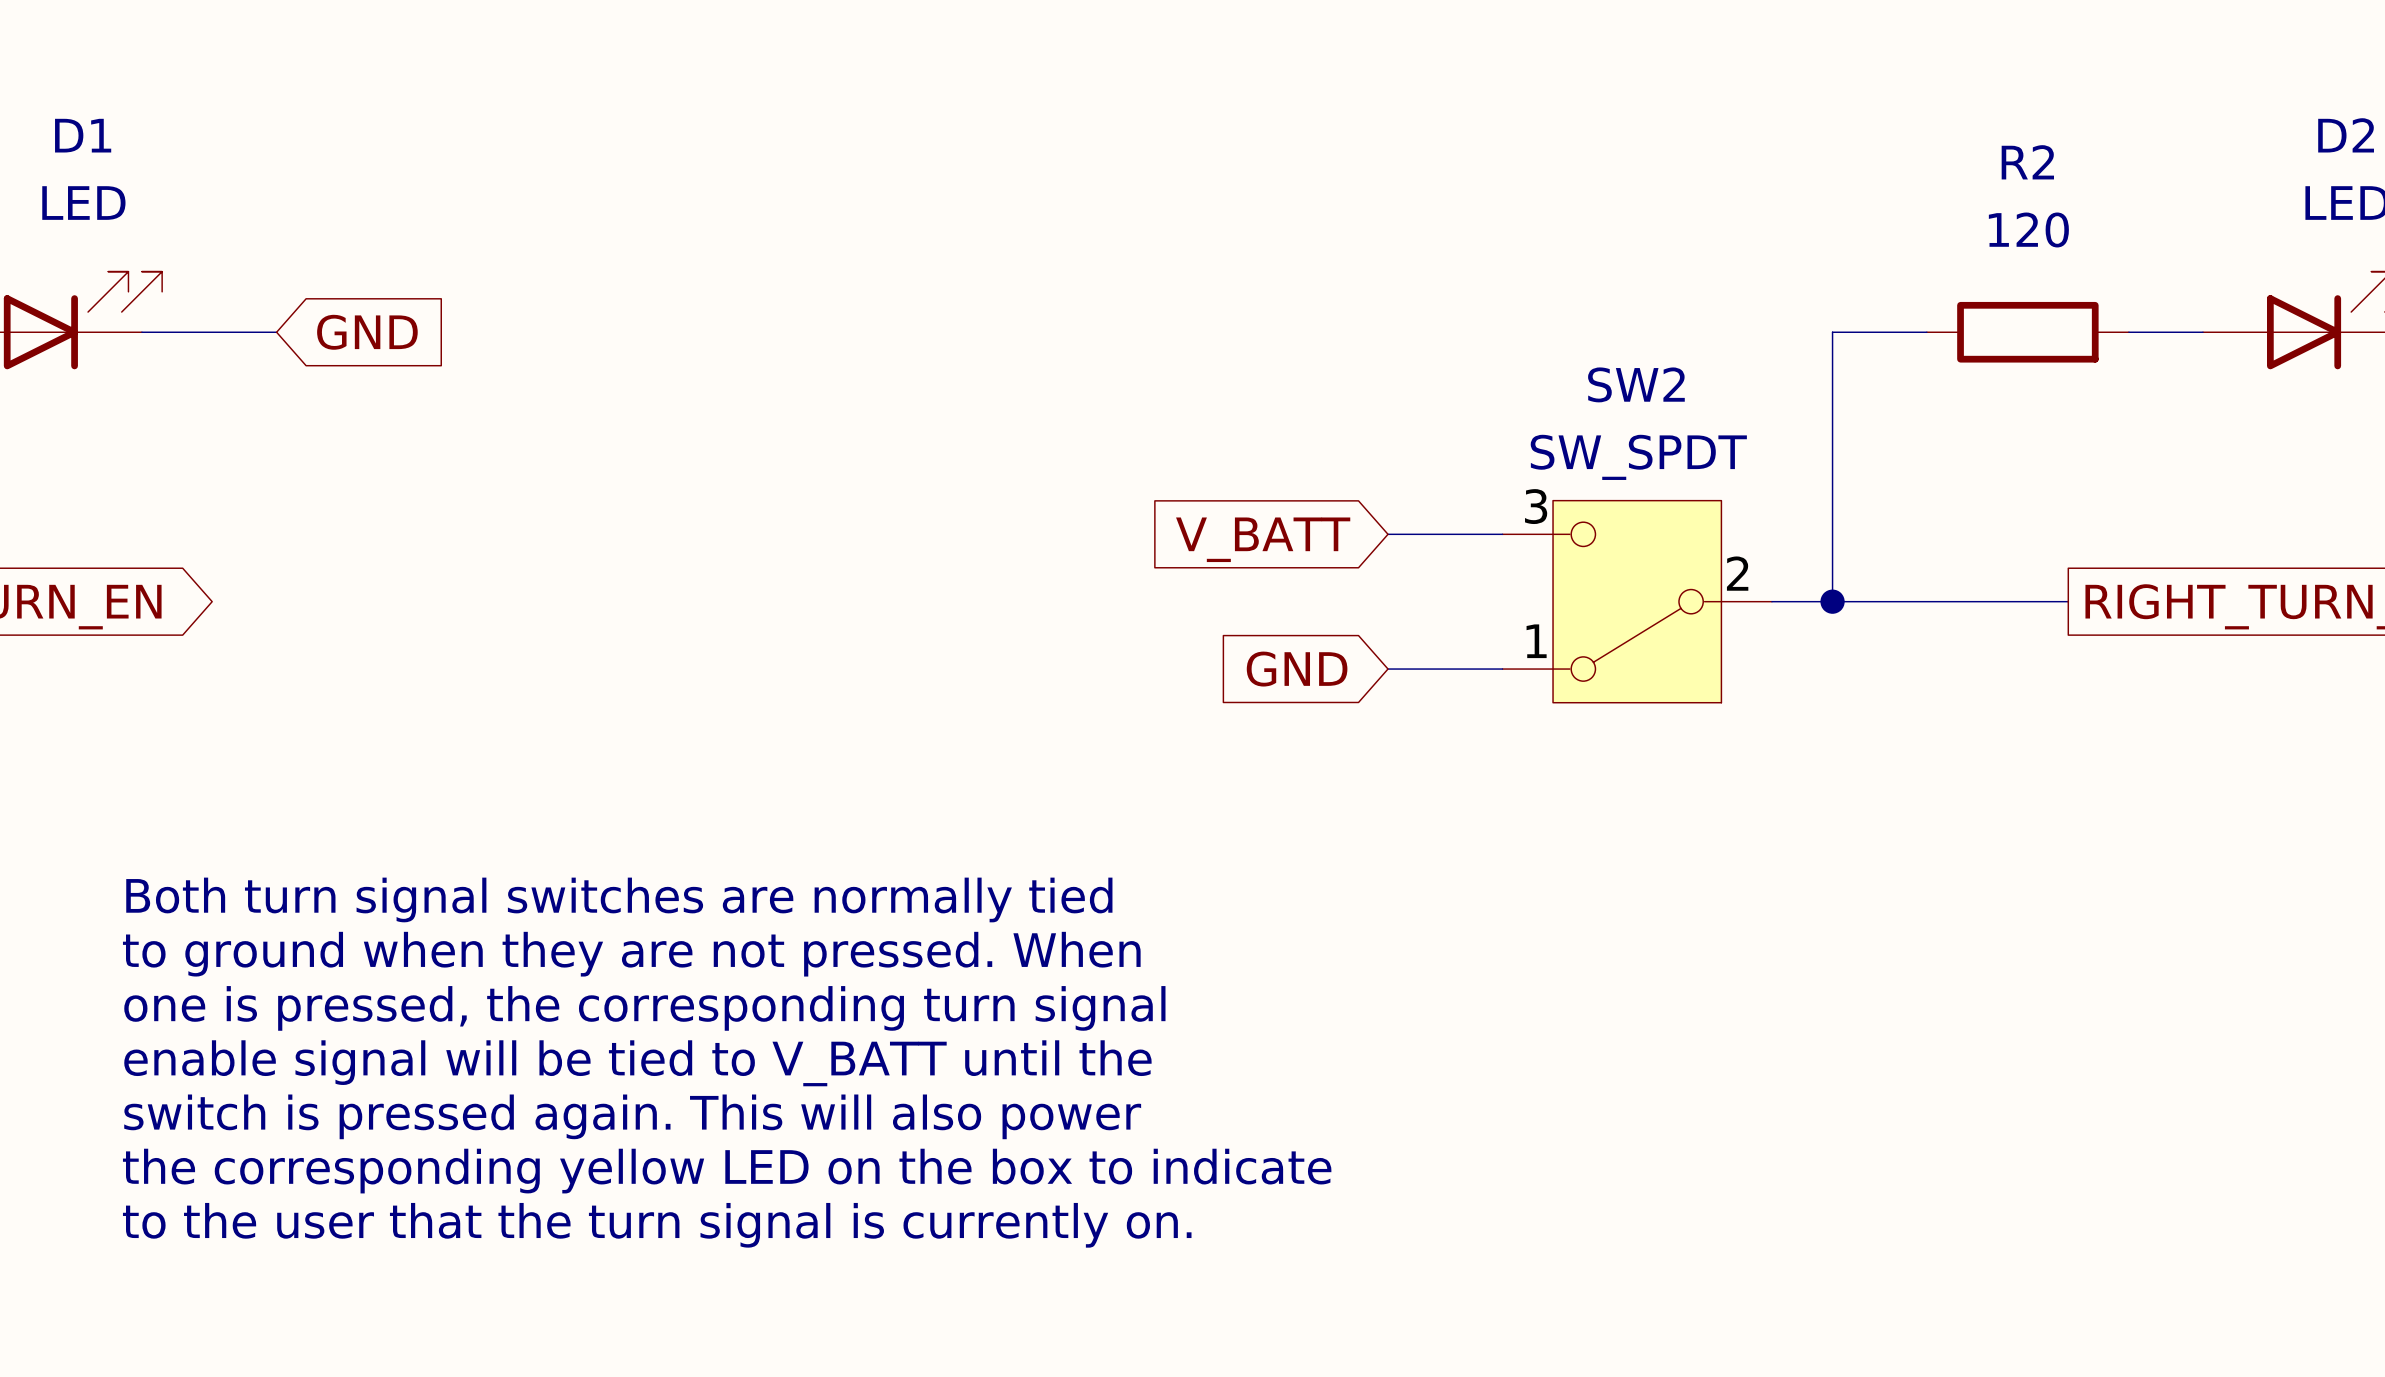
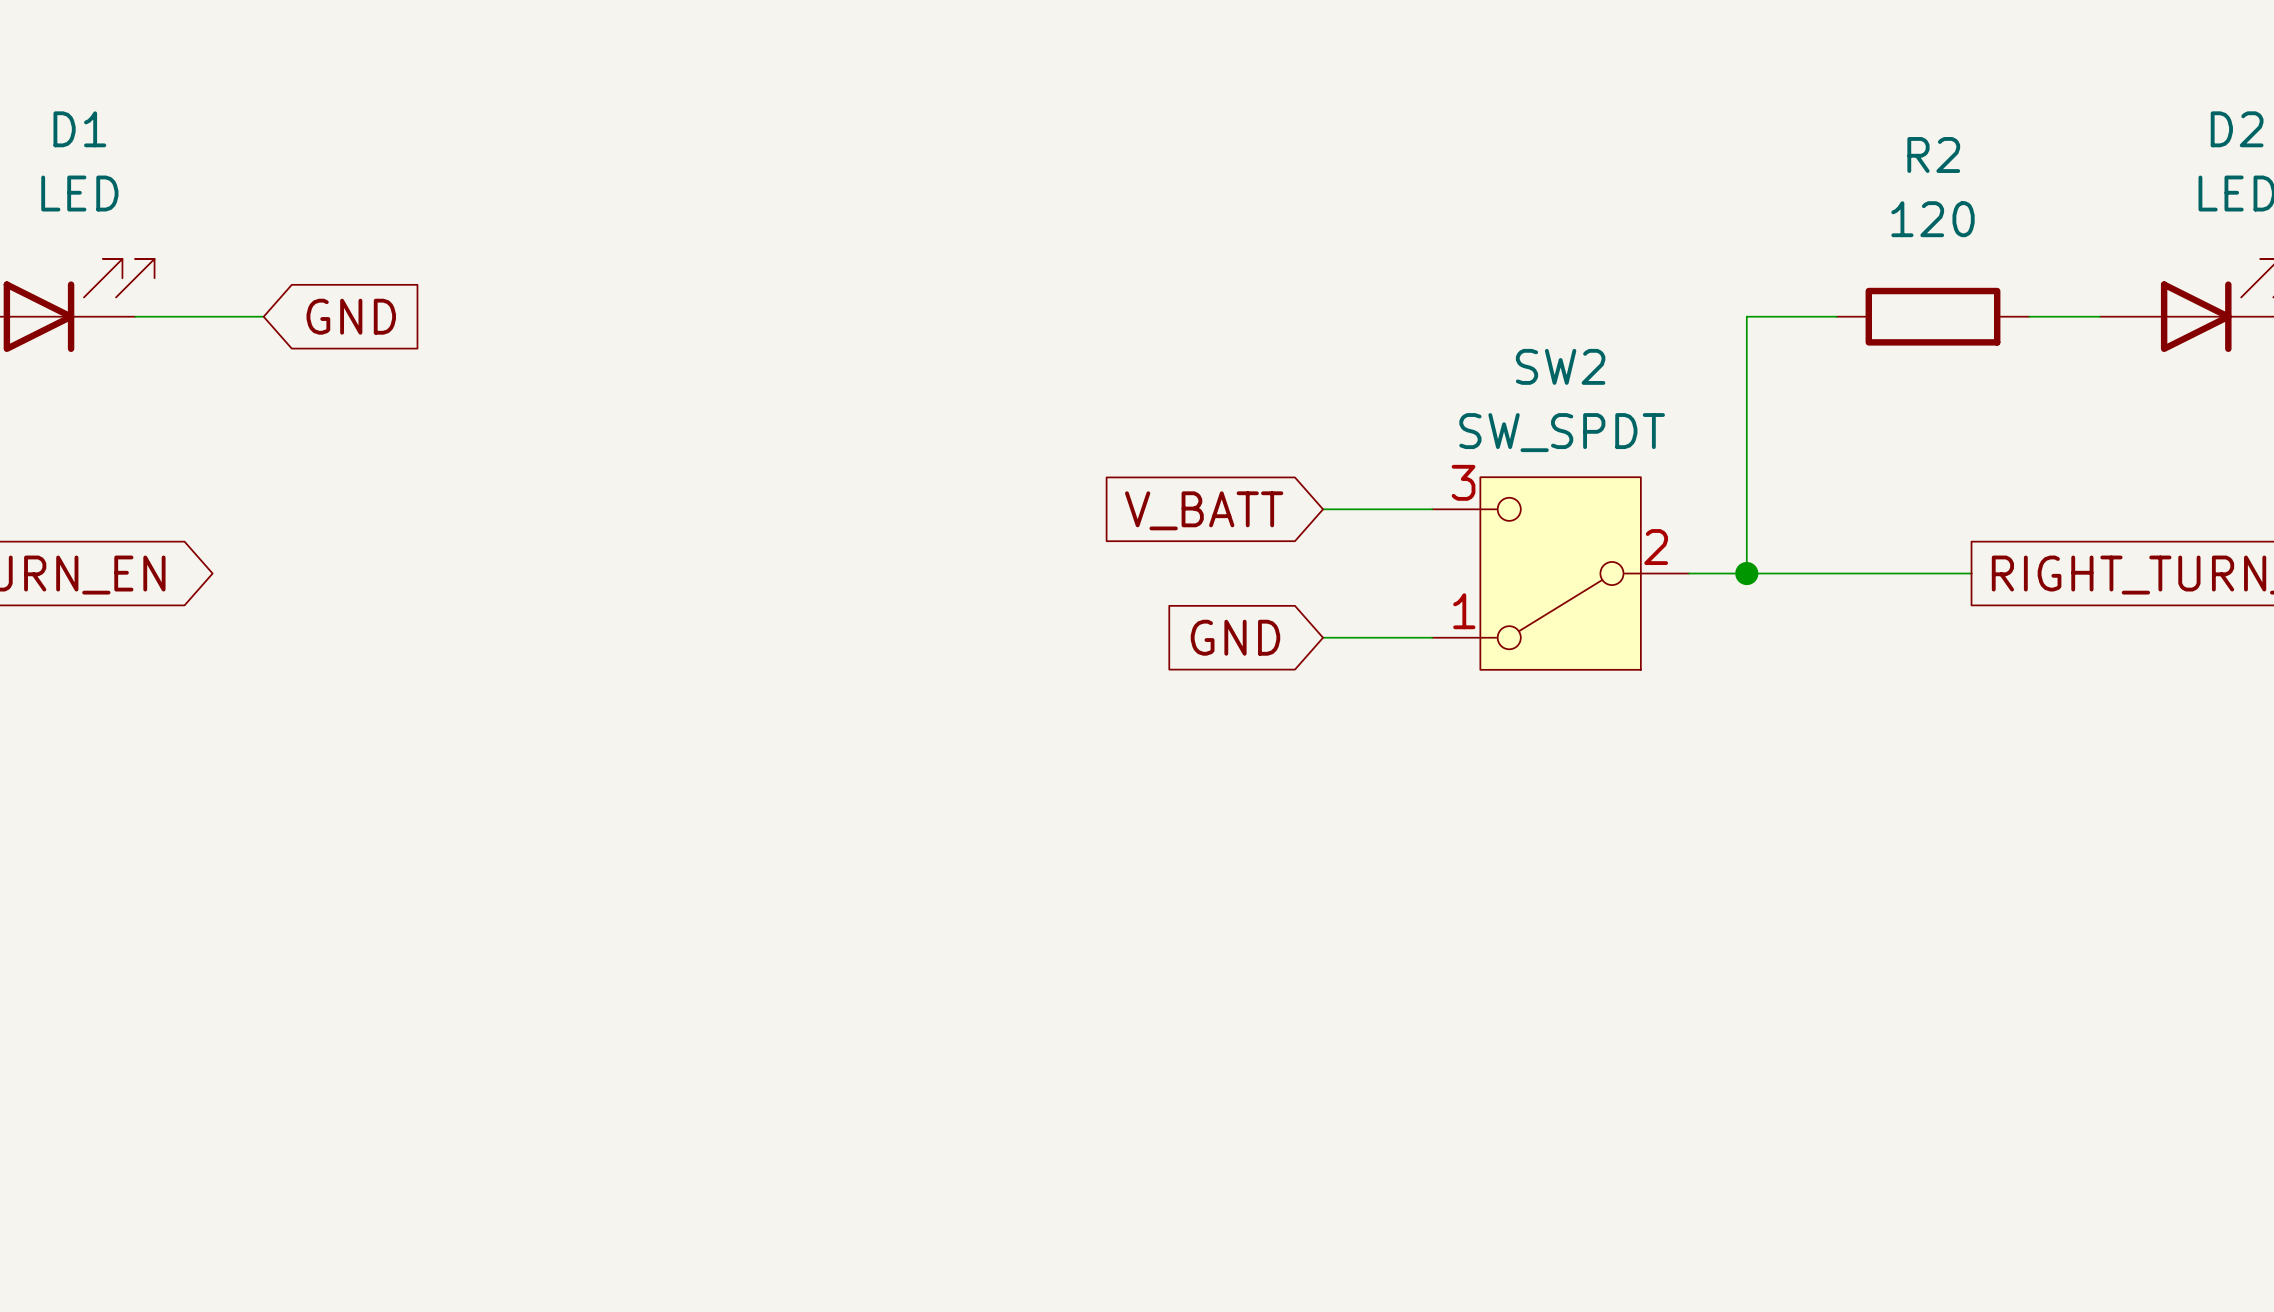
text: Both turn signal switches are normally tied (619, 899) -> none
text: to ground when they are not pressed. When (631, 954) -> none
text: one is pressed, the corresponding turn signal (644, 1008) -> none
text: enable signal will be tied to V_BATT until the (637, 1063) -> none
text: switch is pressed again. This will also power (632, 1116) -> none
text: the corresponding yellow LED on the box to indicate (727, 1171) -> none
text: to the user that the turn signal is currently on. (657, 1225) -> none

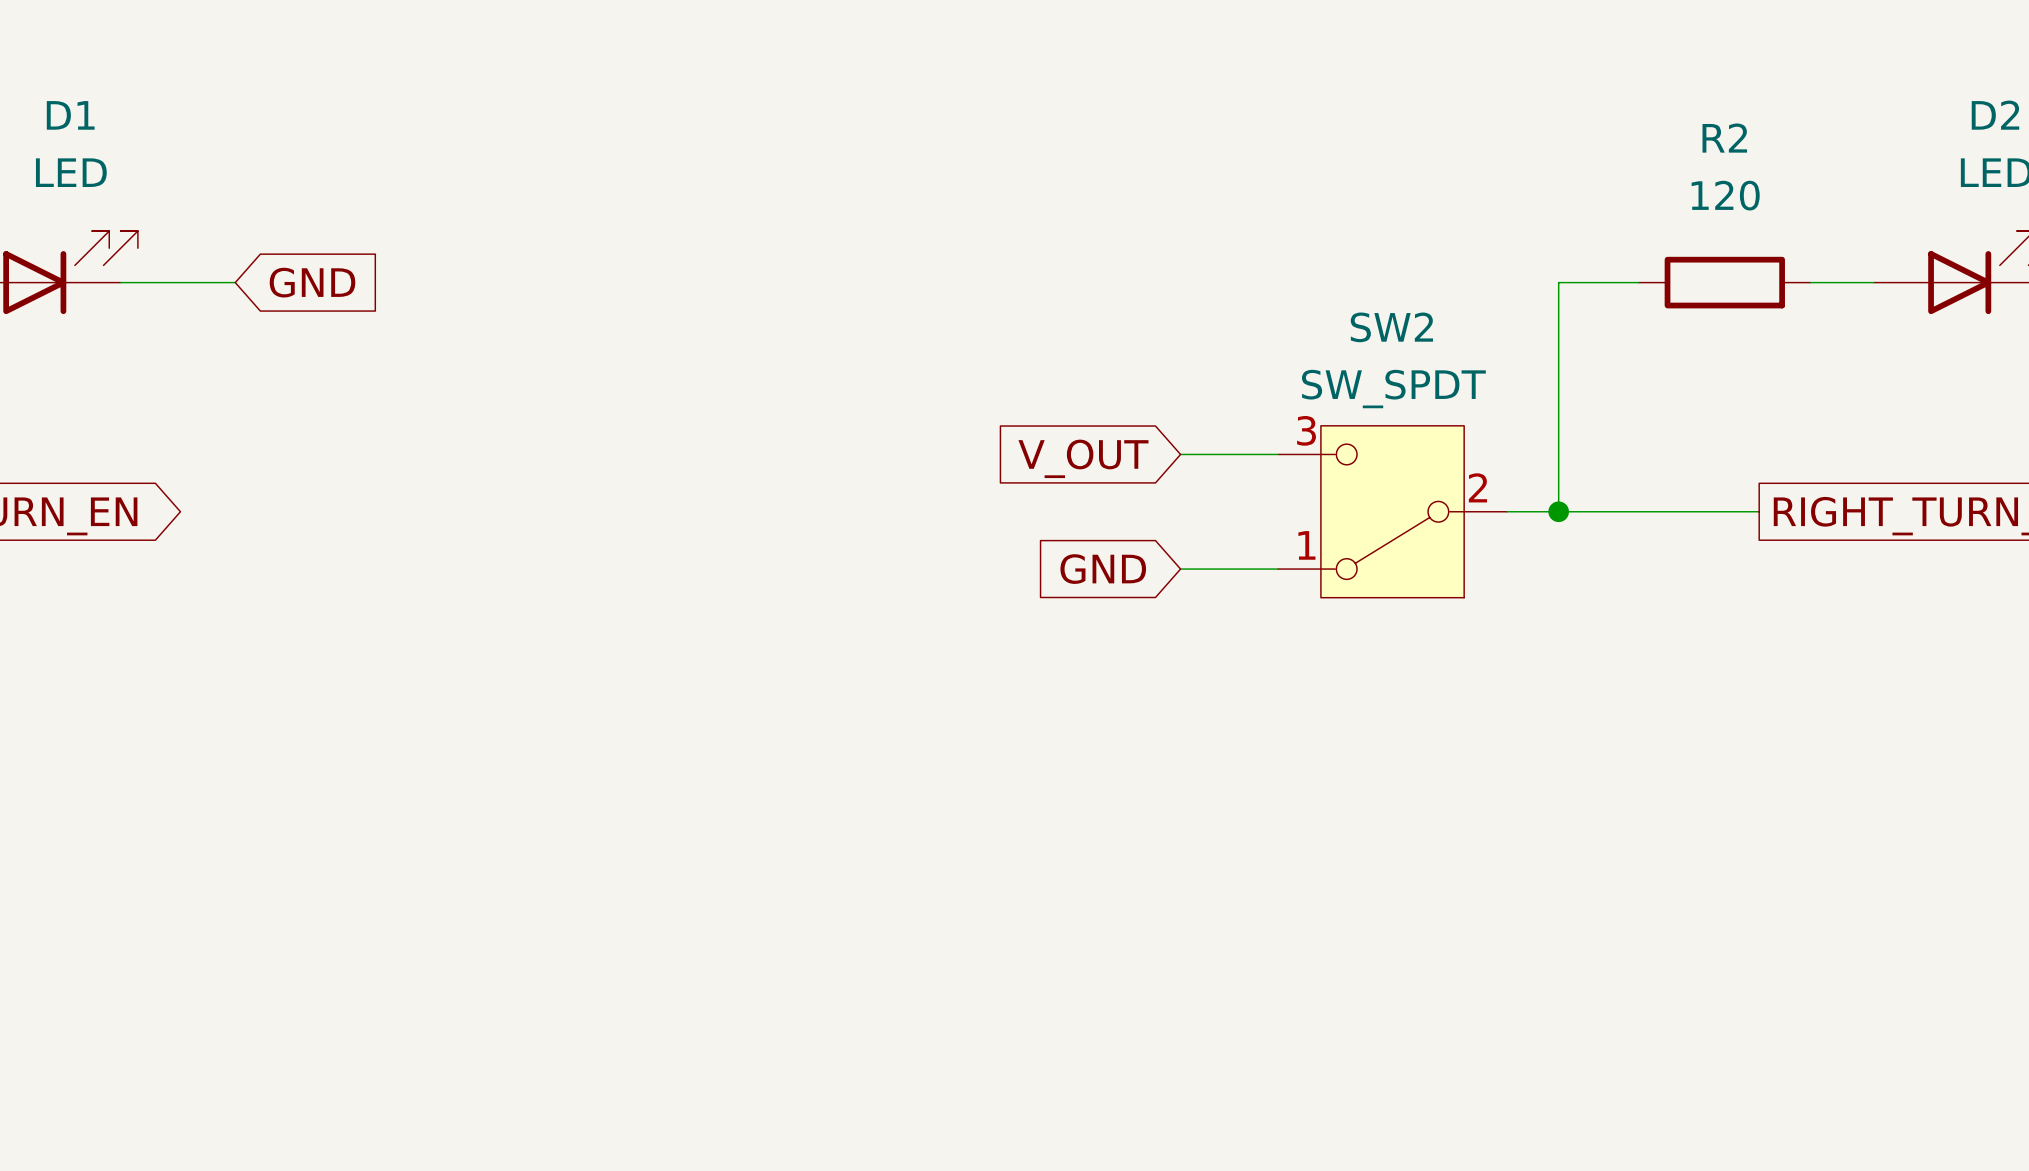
global label: V_BATT (1204, 510) -> V_OUT (1083, 458)

